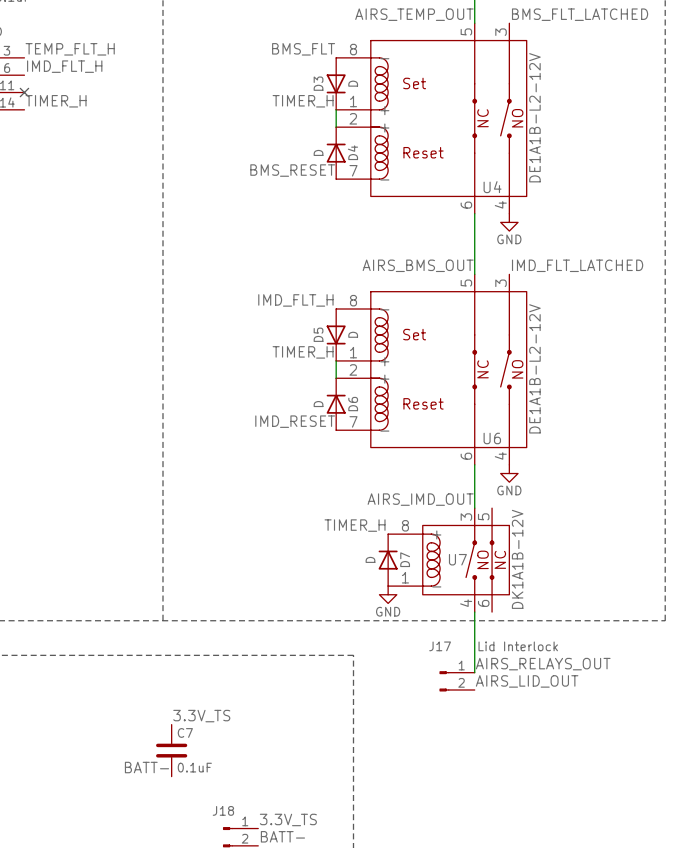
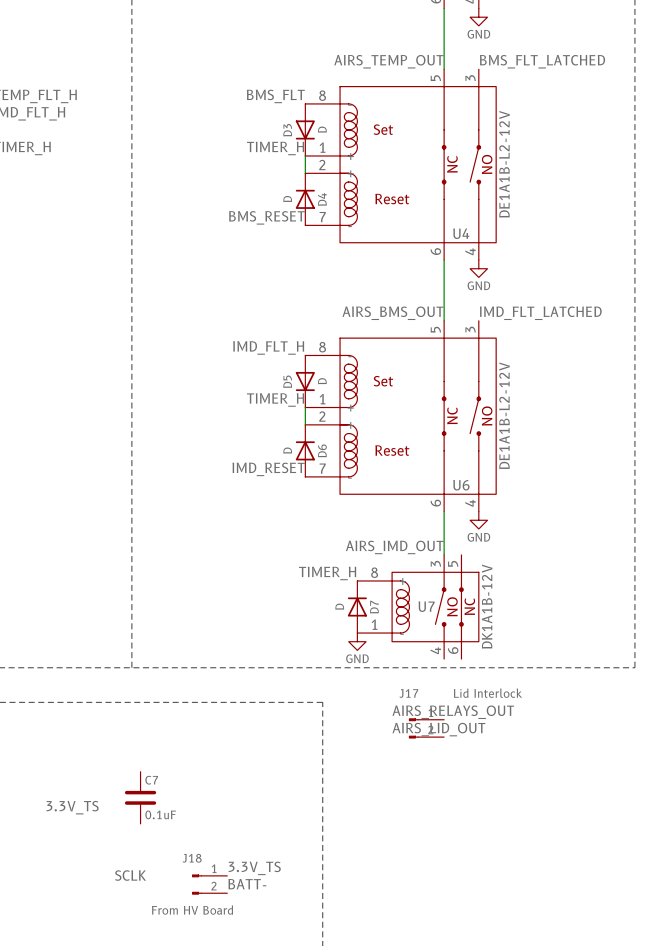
wire: (474, 612) (474, 672) -> none
label position: AIRS_RELAYS_OUT (543, 664) -> AIRS_RELAYS_OUT (453, 712)
label position: AIRS_LID_OUT (527, 681) -> AIRS_LID_OUT (438, 729)
label position: 3.3V_TS (201, 716) -> 3.3V_TS (72, 807)
label: BATT- (146, 767) -> none
label: none -> SCLK (130, 875)

